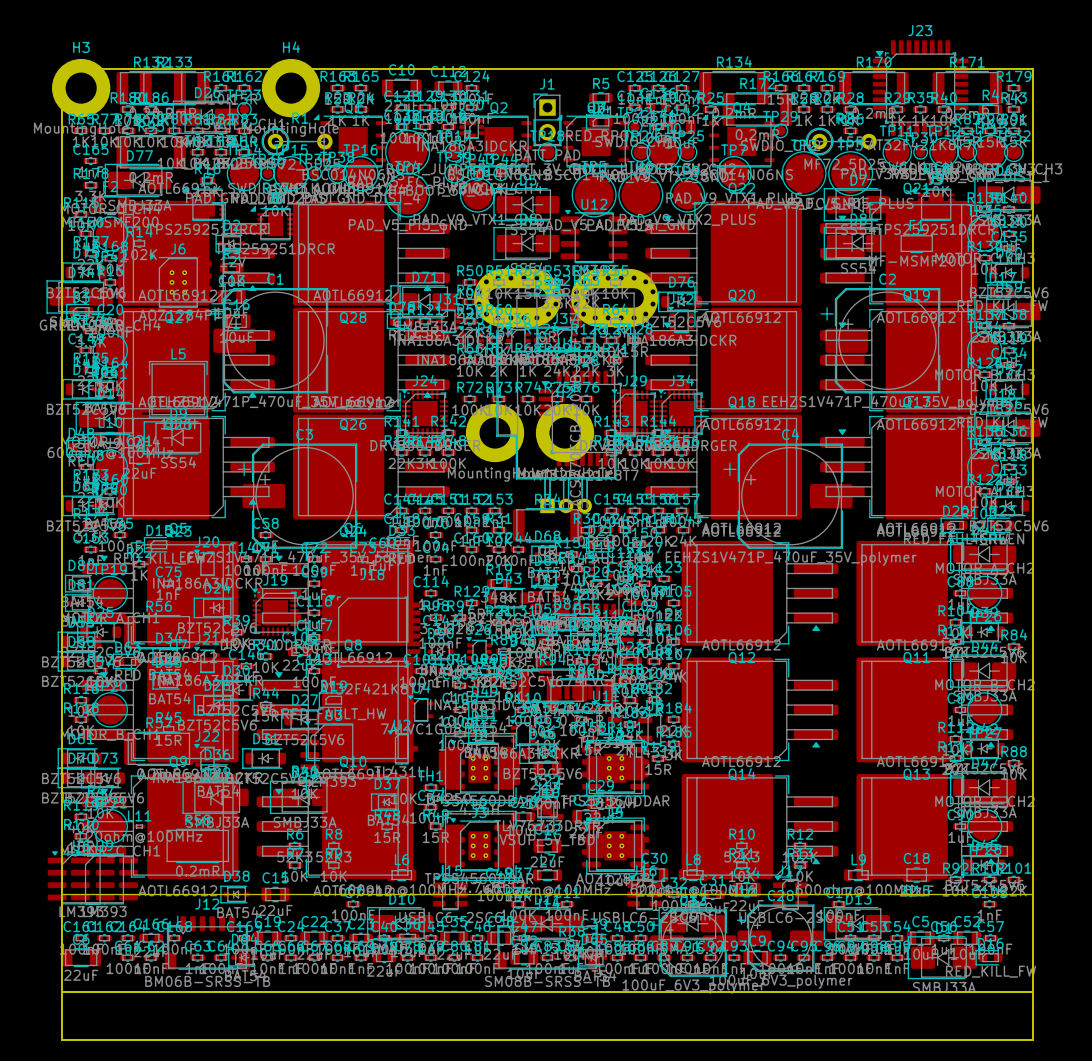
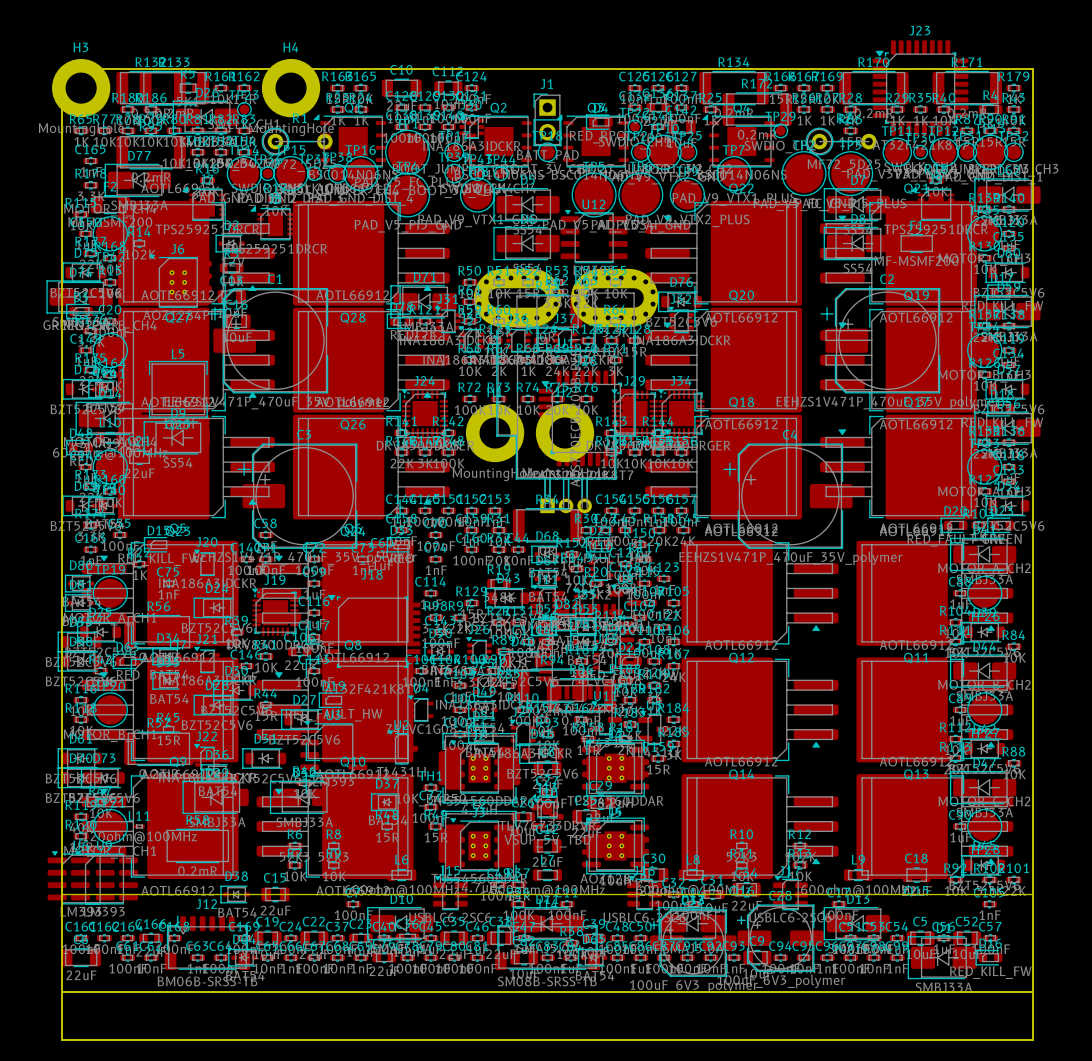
R5 position: (600, 97) -> (188, 88)

